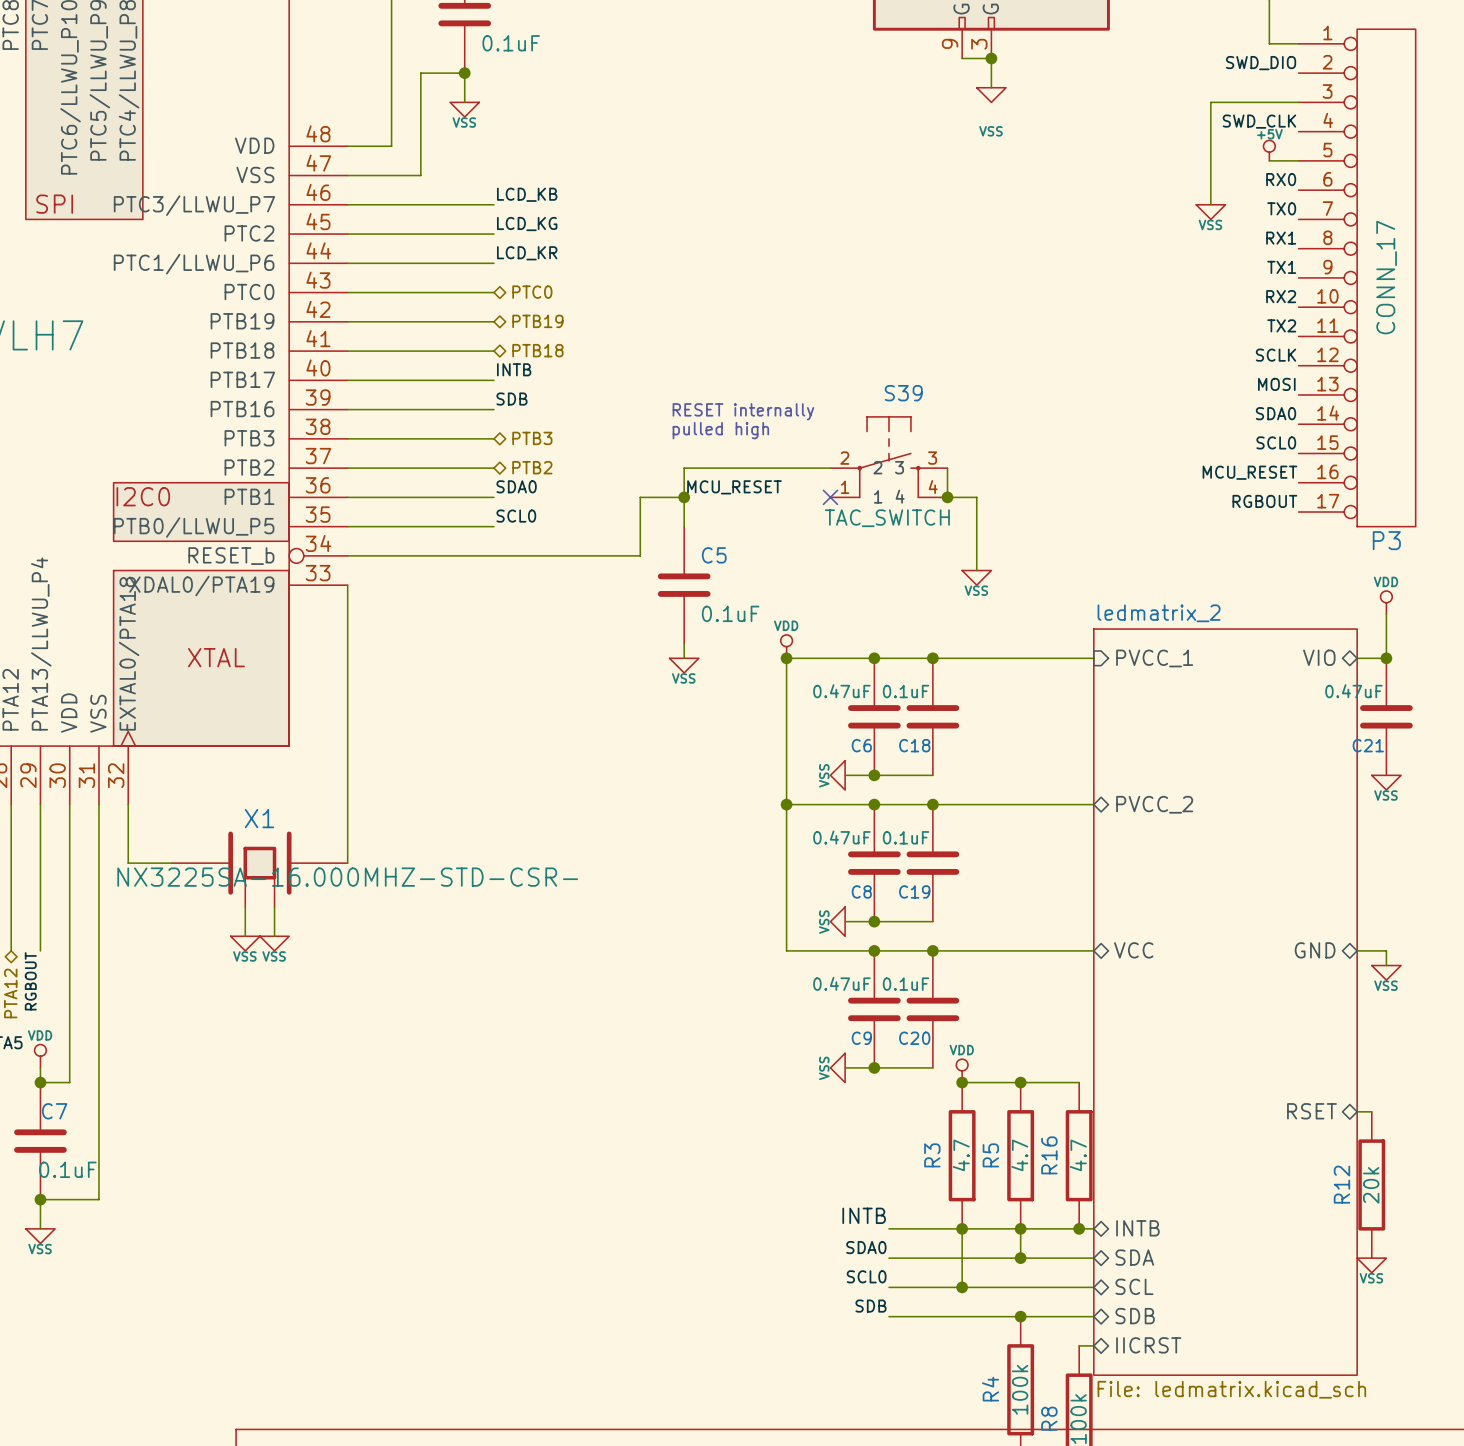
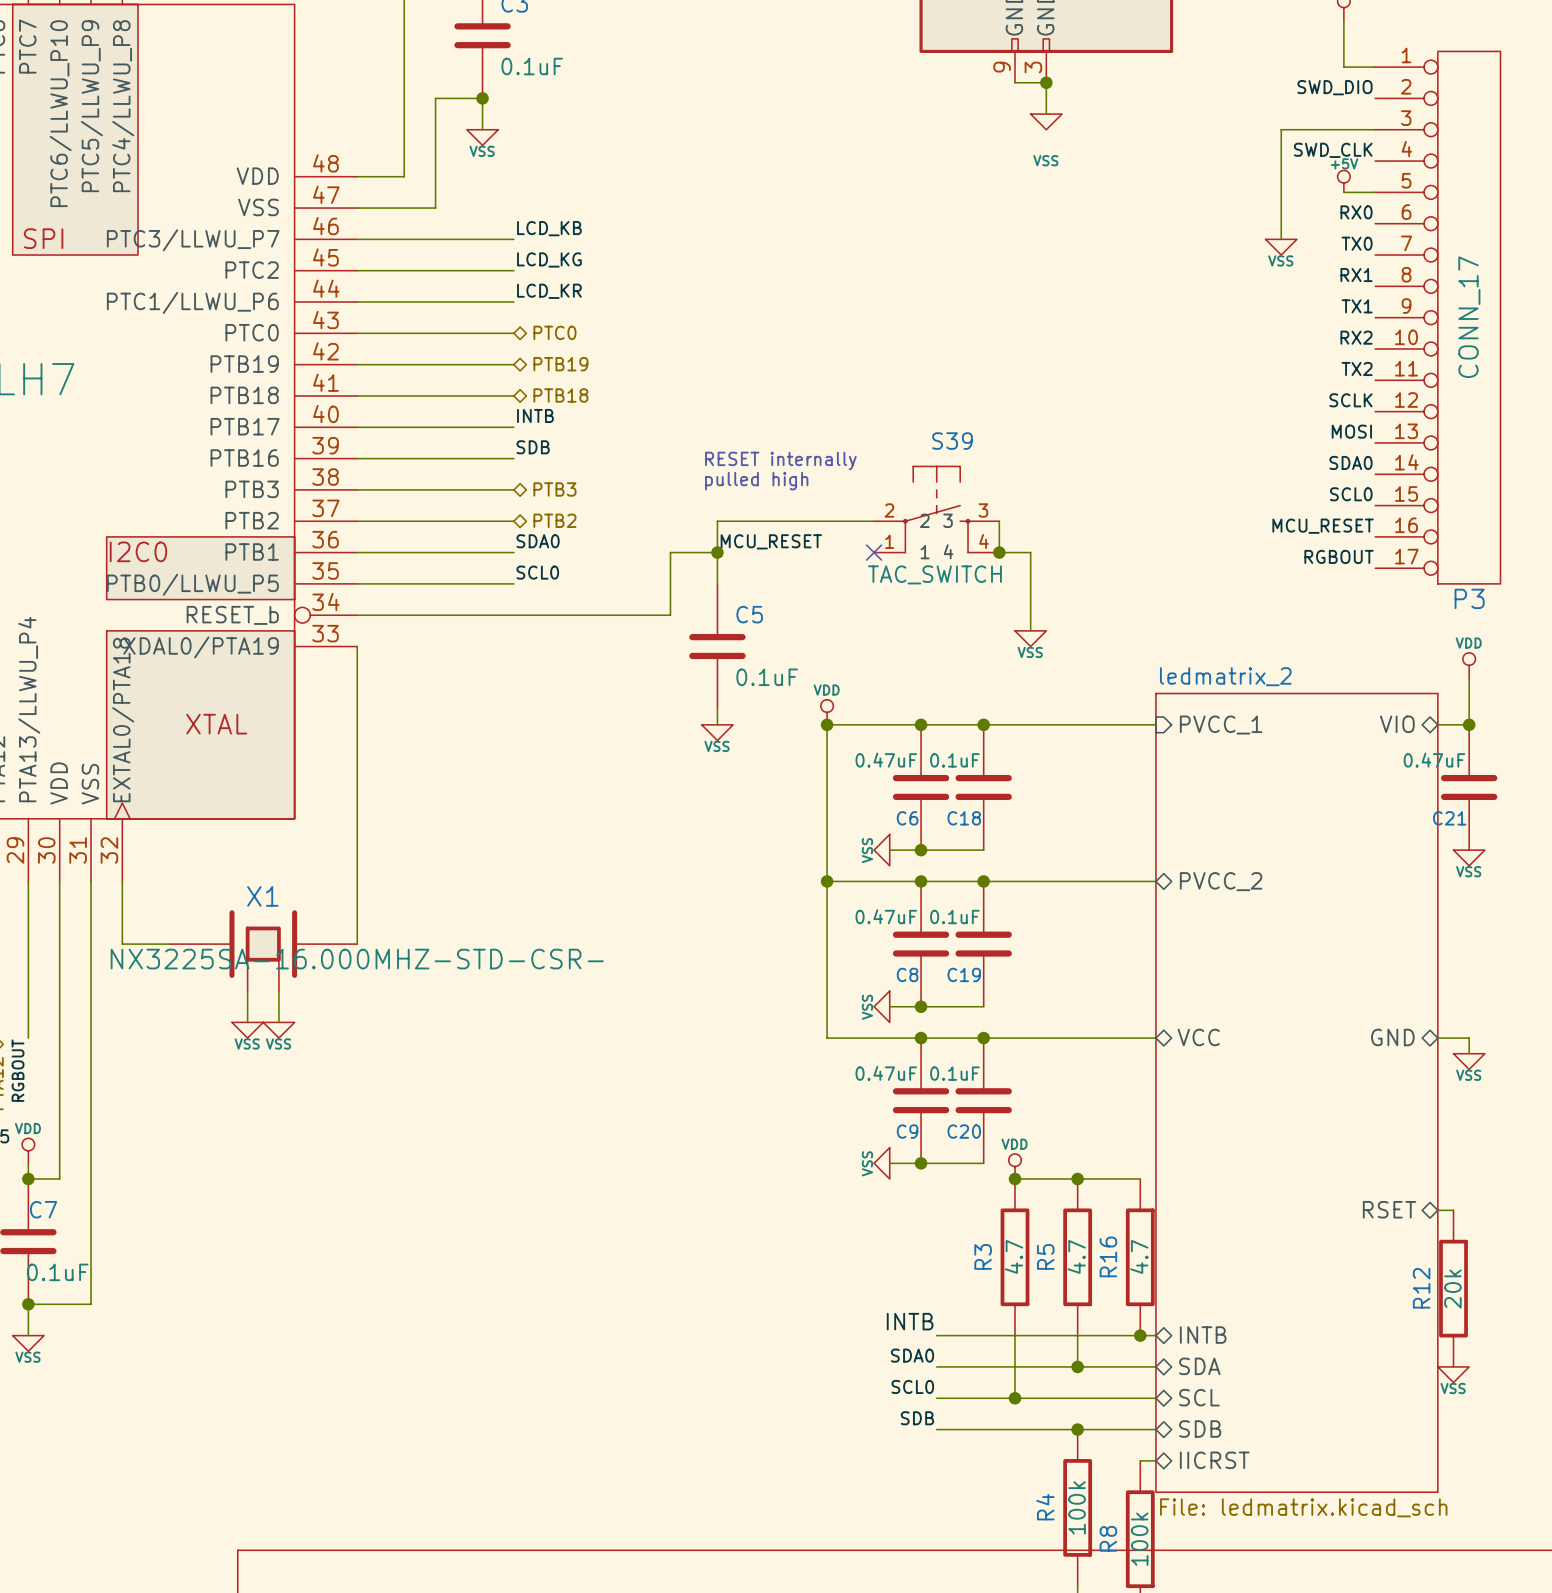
junction: (962, 1228) -> none
junction: (1020, 1228) -> none

